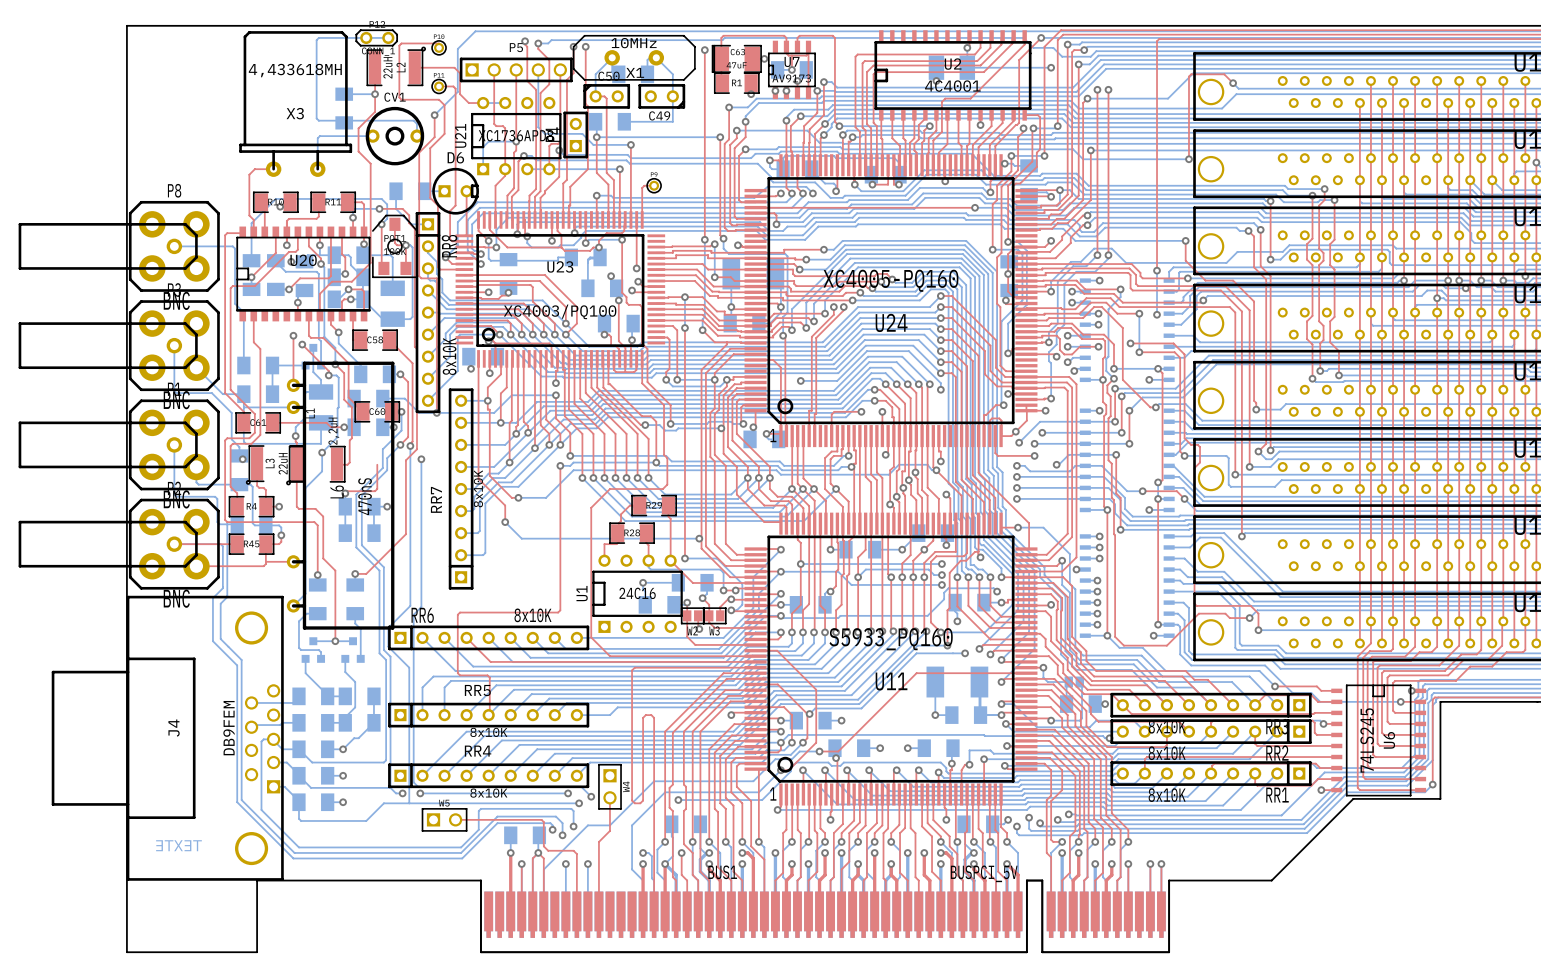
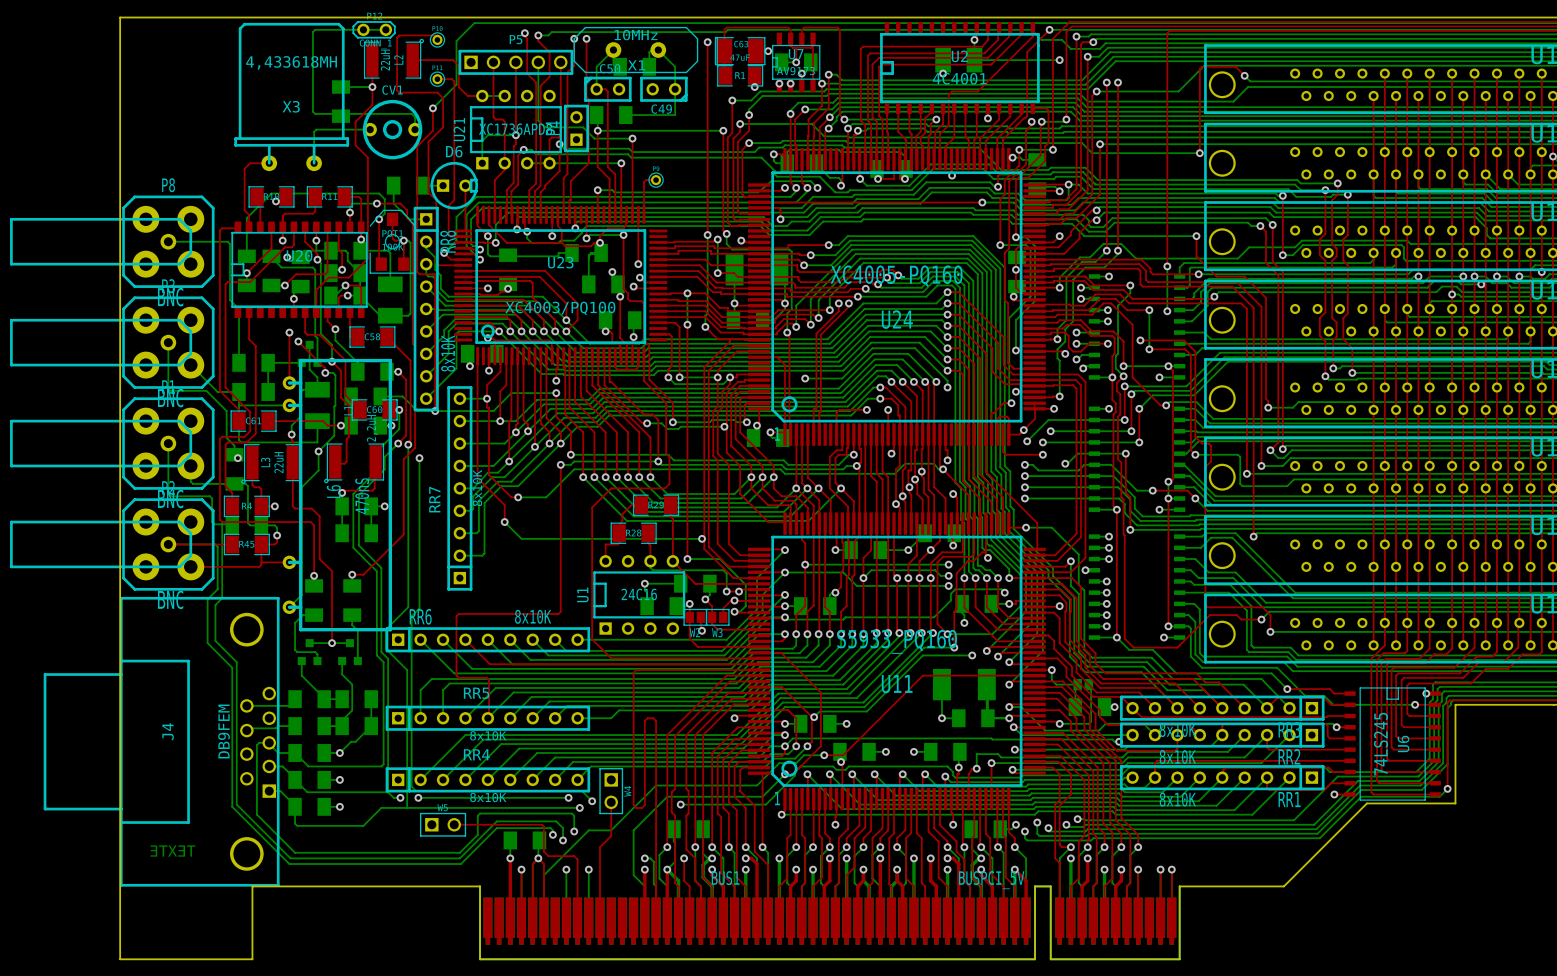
L1 position: (315, 465) -> (354, 463)

